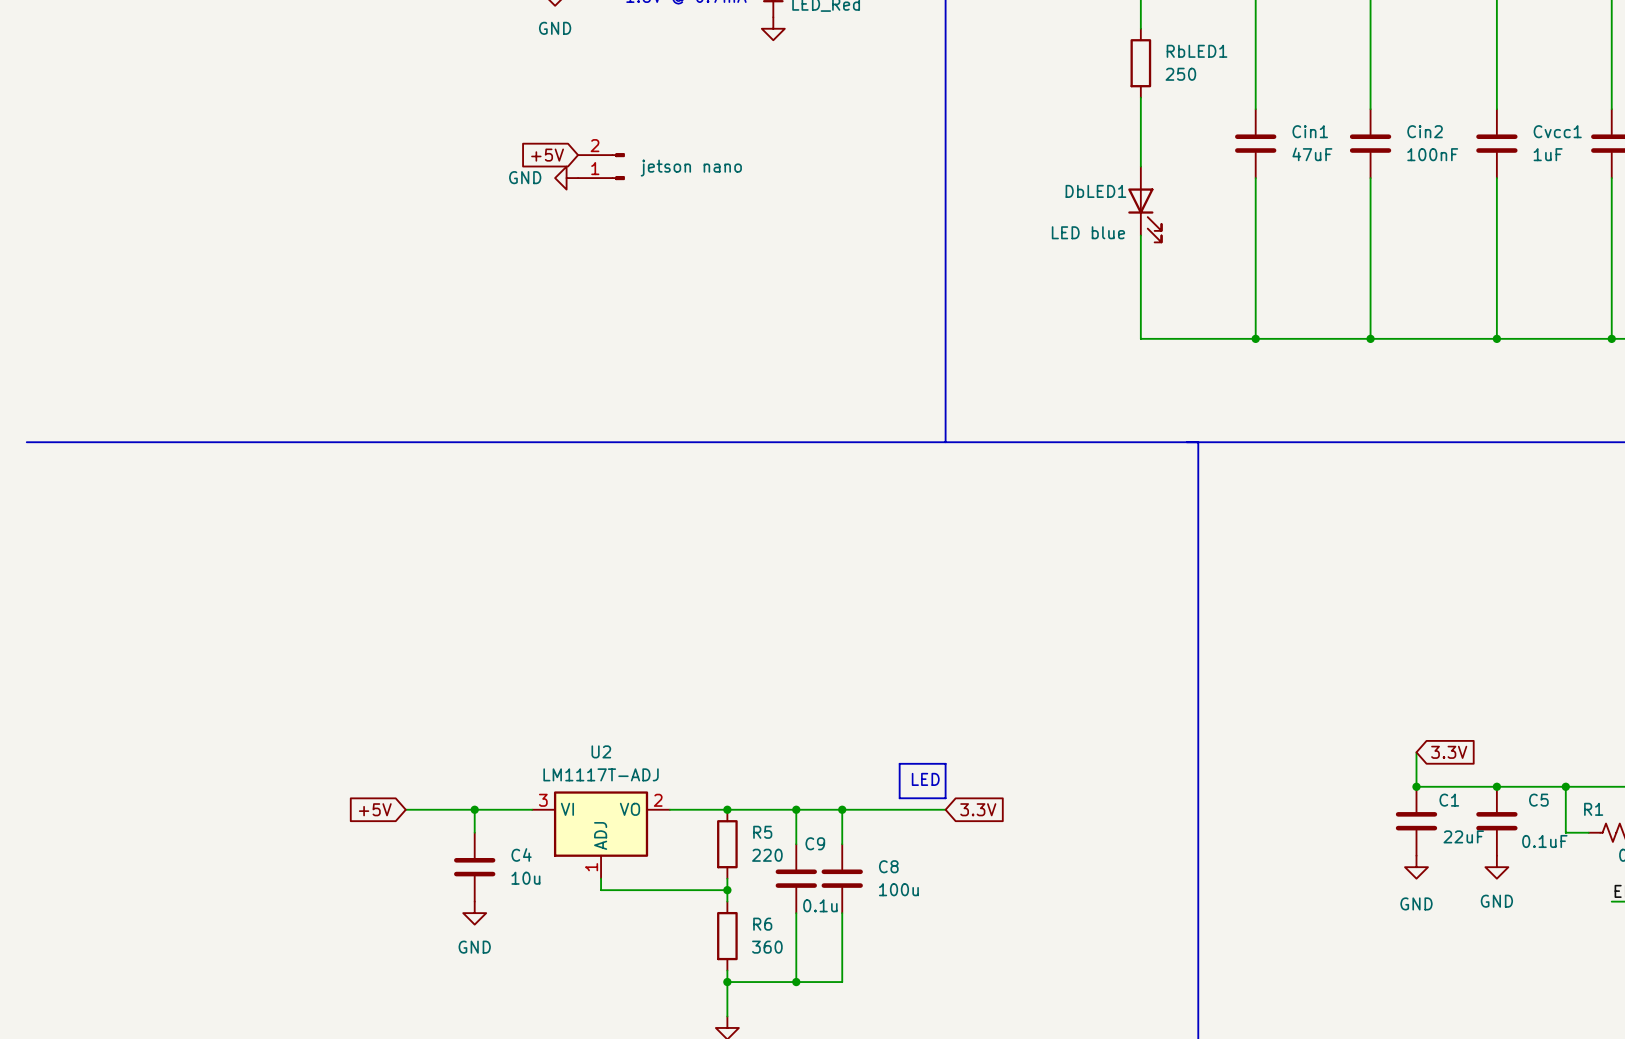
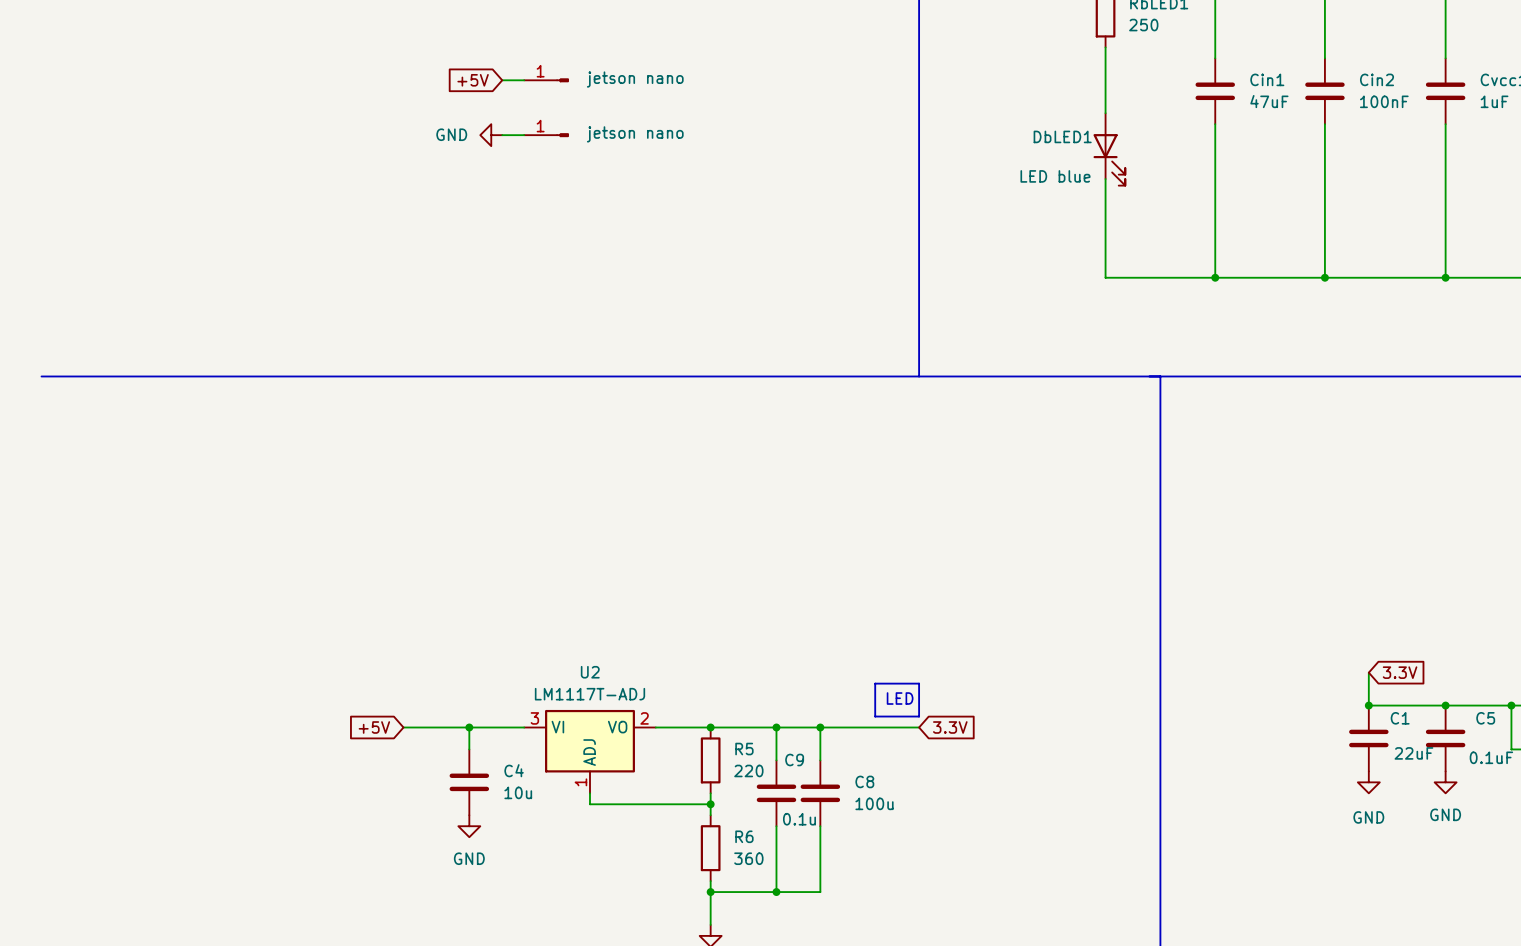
wire: none -> (502, 80) (524, 80)
part: none -> jetson nano (546, 80)
global label position: +5V (547, 155) -> +5V (473, 80)
part: jetson nano (601, 166) -> none
power symbol position: GND (566, 178) -> GND (491, 135)
wire: none -> (502, 135) (524, 135)
part: none -> jetson nano (546, 135)

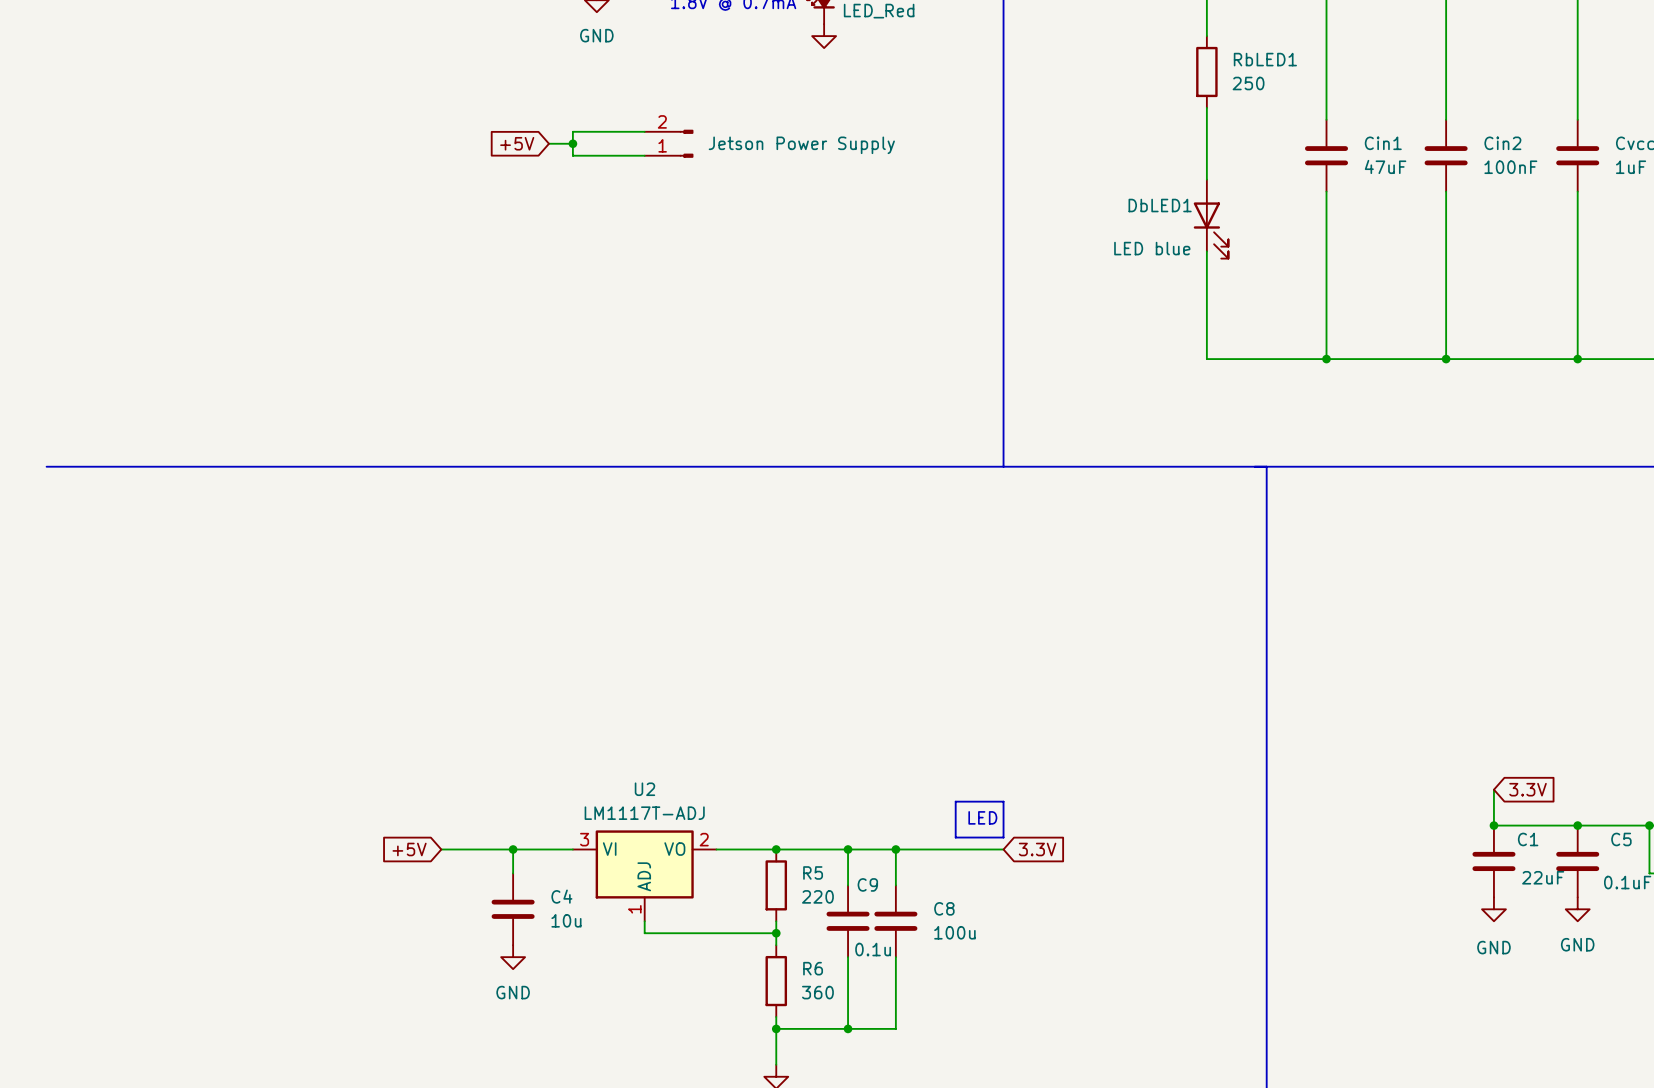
wire: none -> (644, 131) (572, 131) (572, 155) (644, 155)
junction: none -> (572, 143)
part: jetson nano (546, 80) -> none
part: none -> Jetson Power Supply (668, 143)
power symbol: GND (491, 135) -> none
wire: (502, 135) (524, 135) -> none
part: jetson nano (546, 135) -> none

